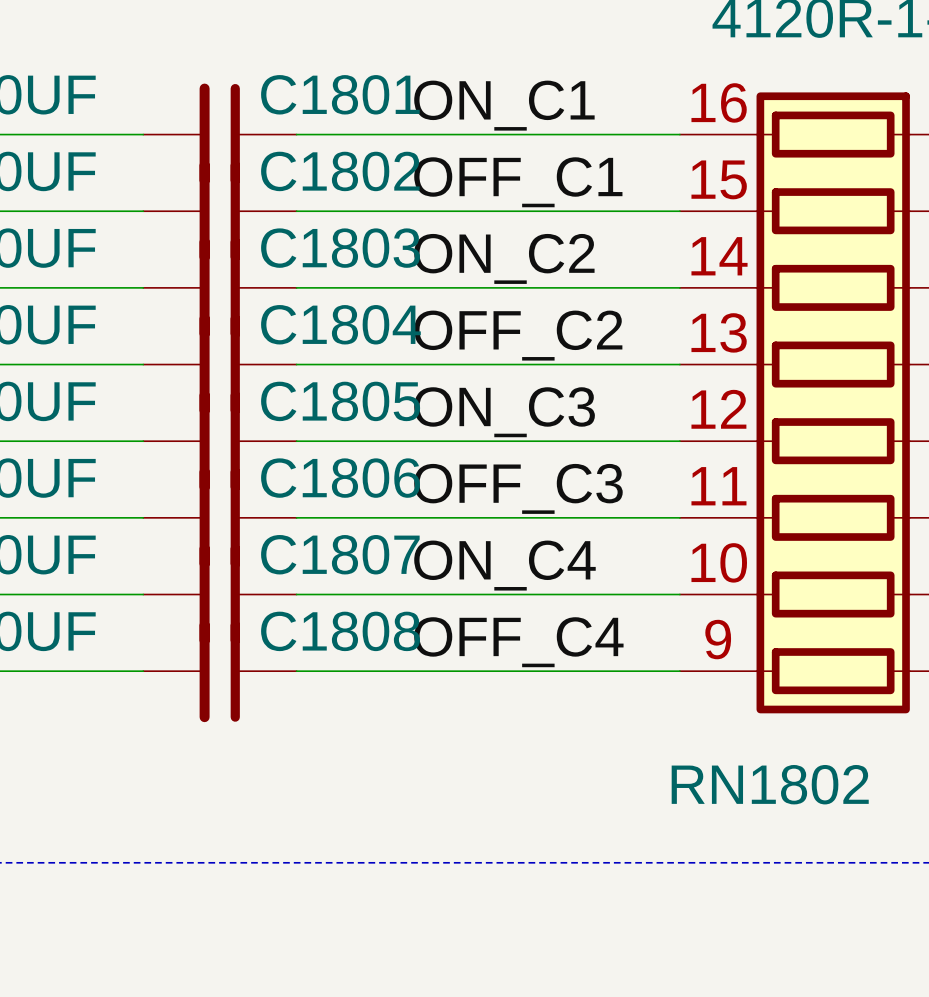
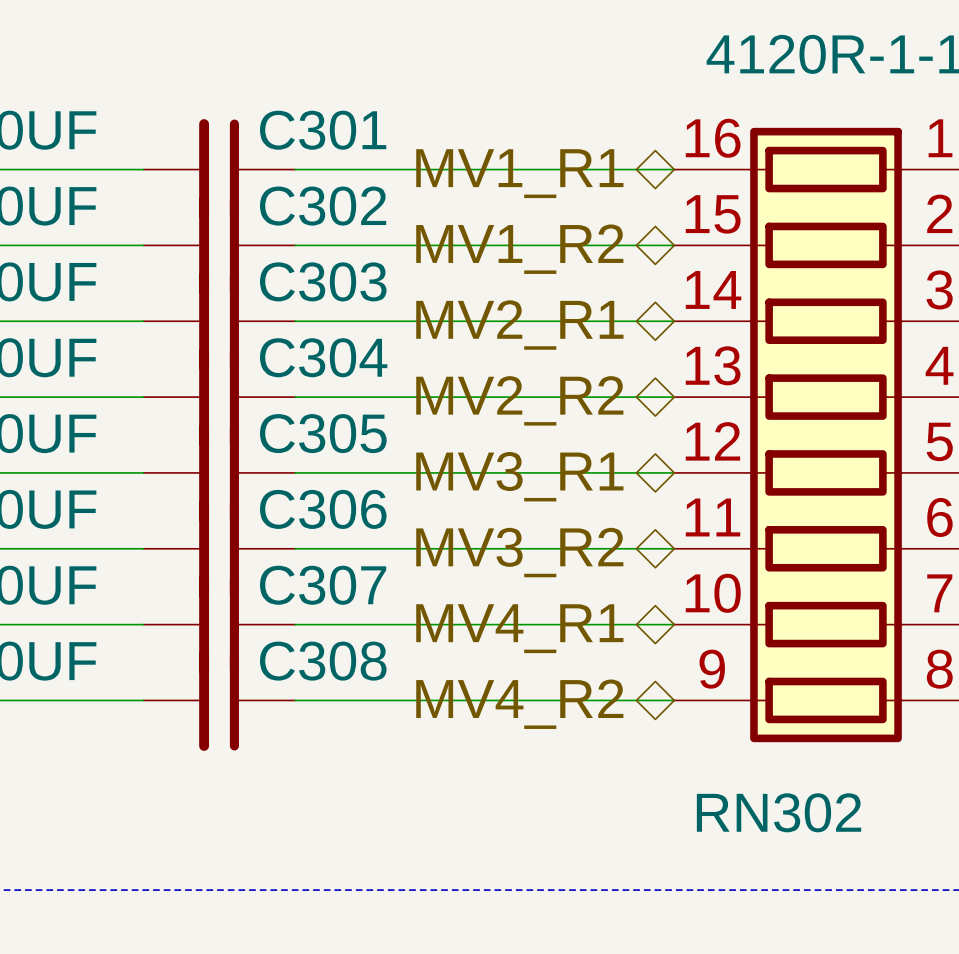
C1801 name: C1801 (340, 94) -> C301 (323, 130)
label: ON_C1 (504, 105) -> none
hierarchical label: none -> MV1_R1 (519, 173)
C1802 name: C1802 (340, 171) -> C302 (323, 206)
label: OFF_C1 (518, 182) -> none
hierarchical label: none -> MV1_R2 (519, 249)
C1803 name: C1803 (340, 248) -> C303 (323, 281)
label: ON_C2 (504, 258) -> none
hierarchical label: none -> MV2_R1 (519, 325)
C1804 name: C1804 (340, 324) -> C304 (323, 357)
label: OFF_C2 (518, 335) -> none
hierarchical label: none -> MV2_R2 (519, 400)
C1805 name: C1805 (340, 401) -> C305 (323, 433)
label: ON_C3 (504, 412) -> none
hierarchical label: none -> MV3_R1 (519, 476)
C1806 name: C1806 (340, 478) -> C306 (323, 509)
label: OFF_C3 (518, 488) -> none
hierarchical label: none -> MV3_R2 (519, 552)
C1807 name: C1807 (340, 554) -> C307 (323, 585)
label: ON_C4 (504, 565) -> none
hierarchical label: none -> MV4_R1 (519, 628)
C1808 name: C1808 (340, 631) -> C308 (323, 661)
label: OFF_C4 (518, 642) -> none
hierarchical label: none -> MV4_R2 (519, 704)
RN1802 name: RN1802 (770, 784) -> RN302 (779, 812)

